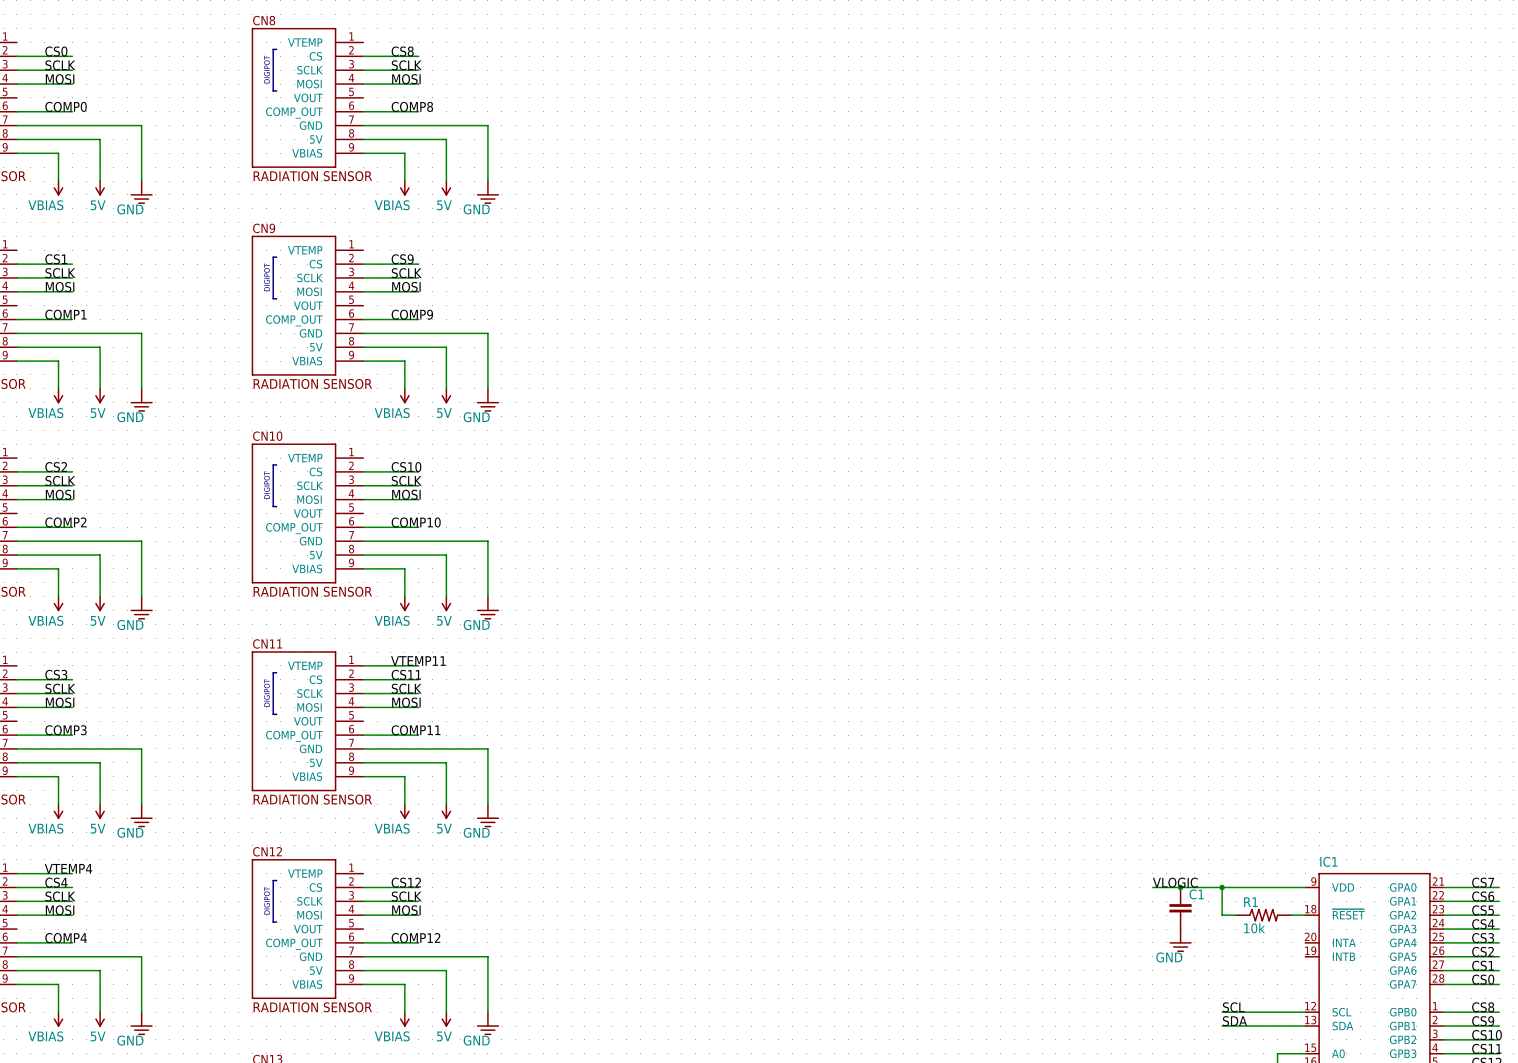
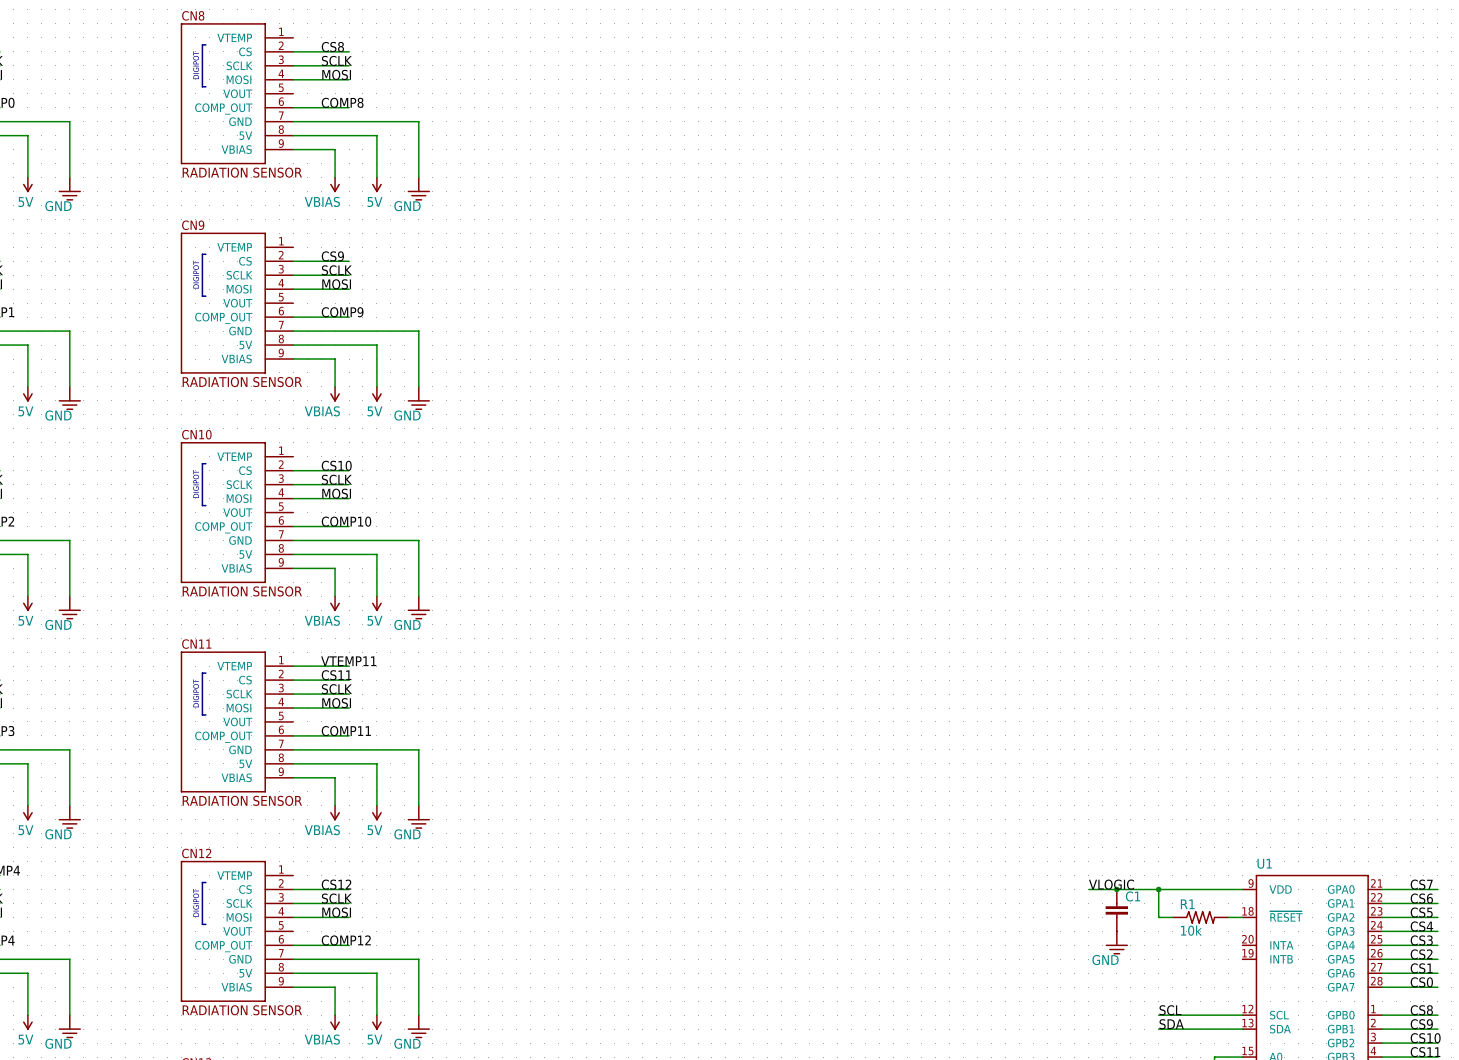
IC1 name: IC1 (1328, 861) -> U1 (1264, 863)

